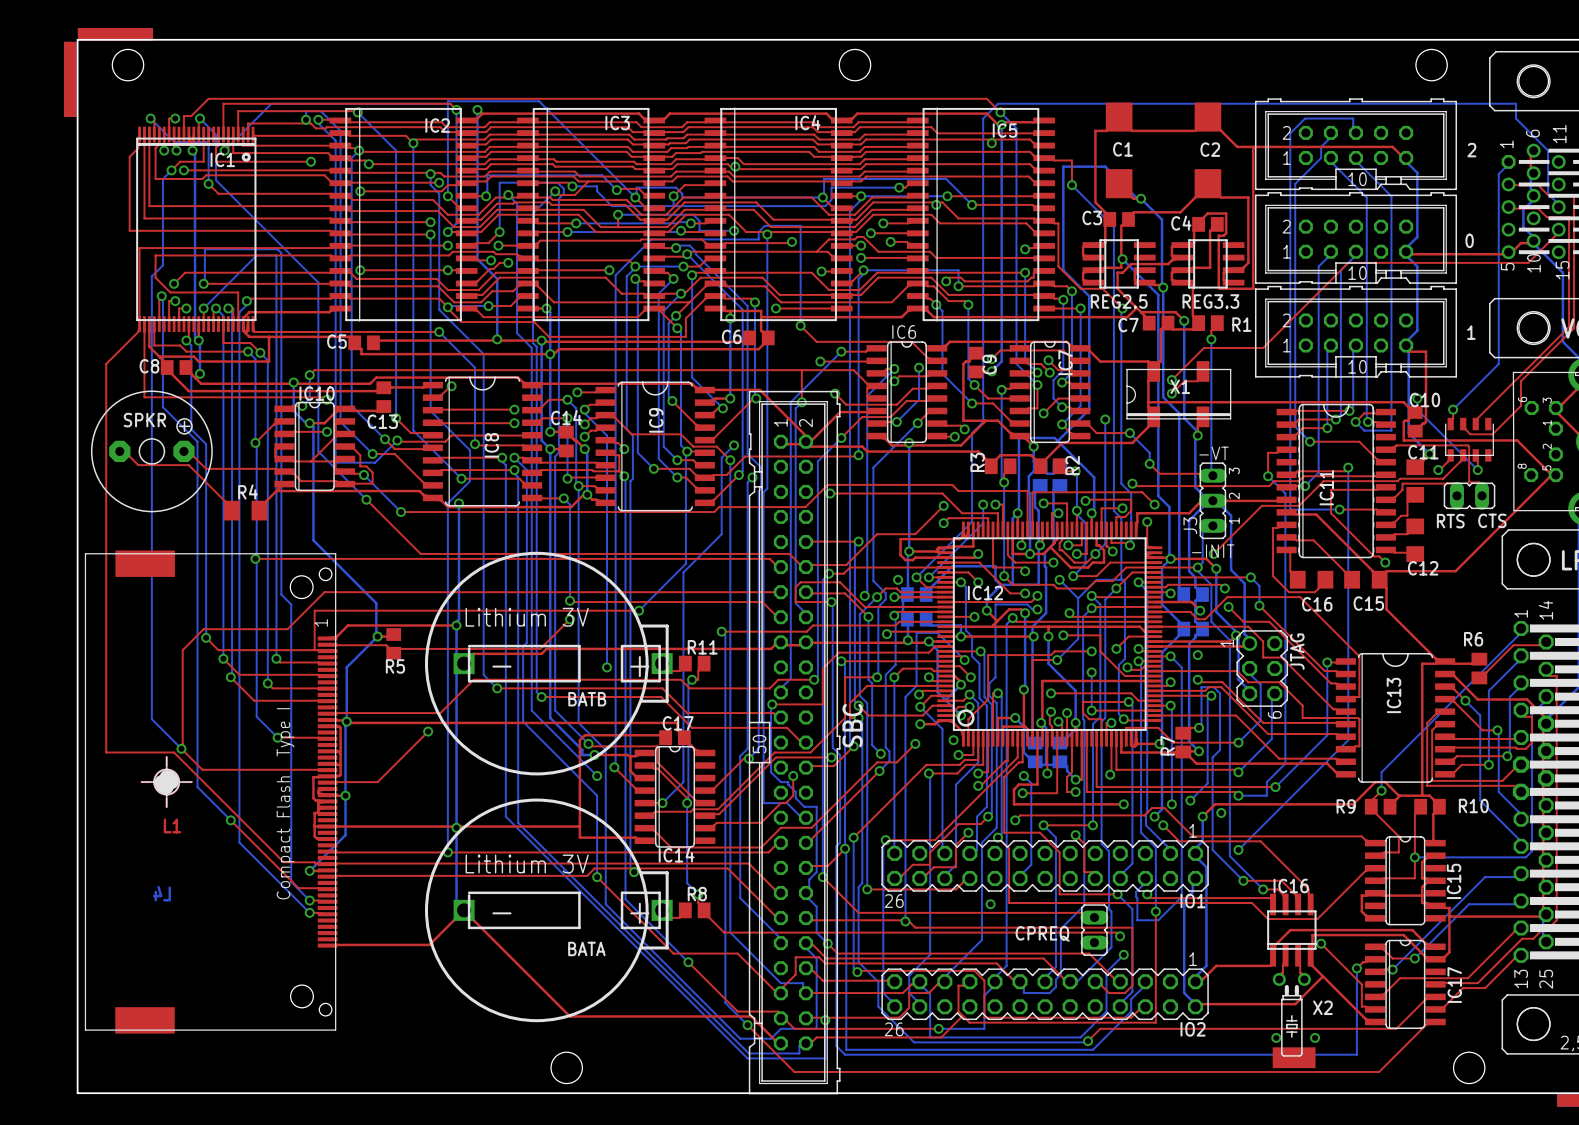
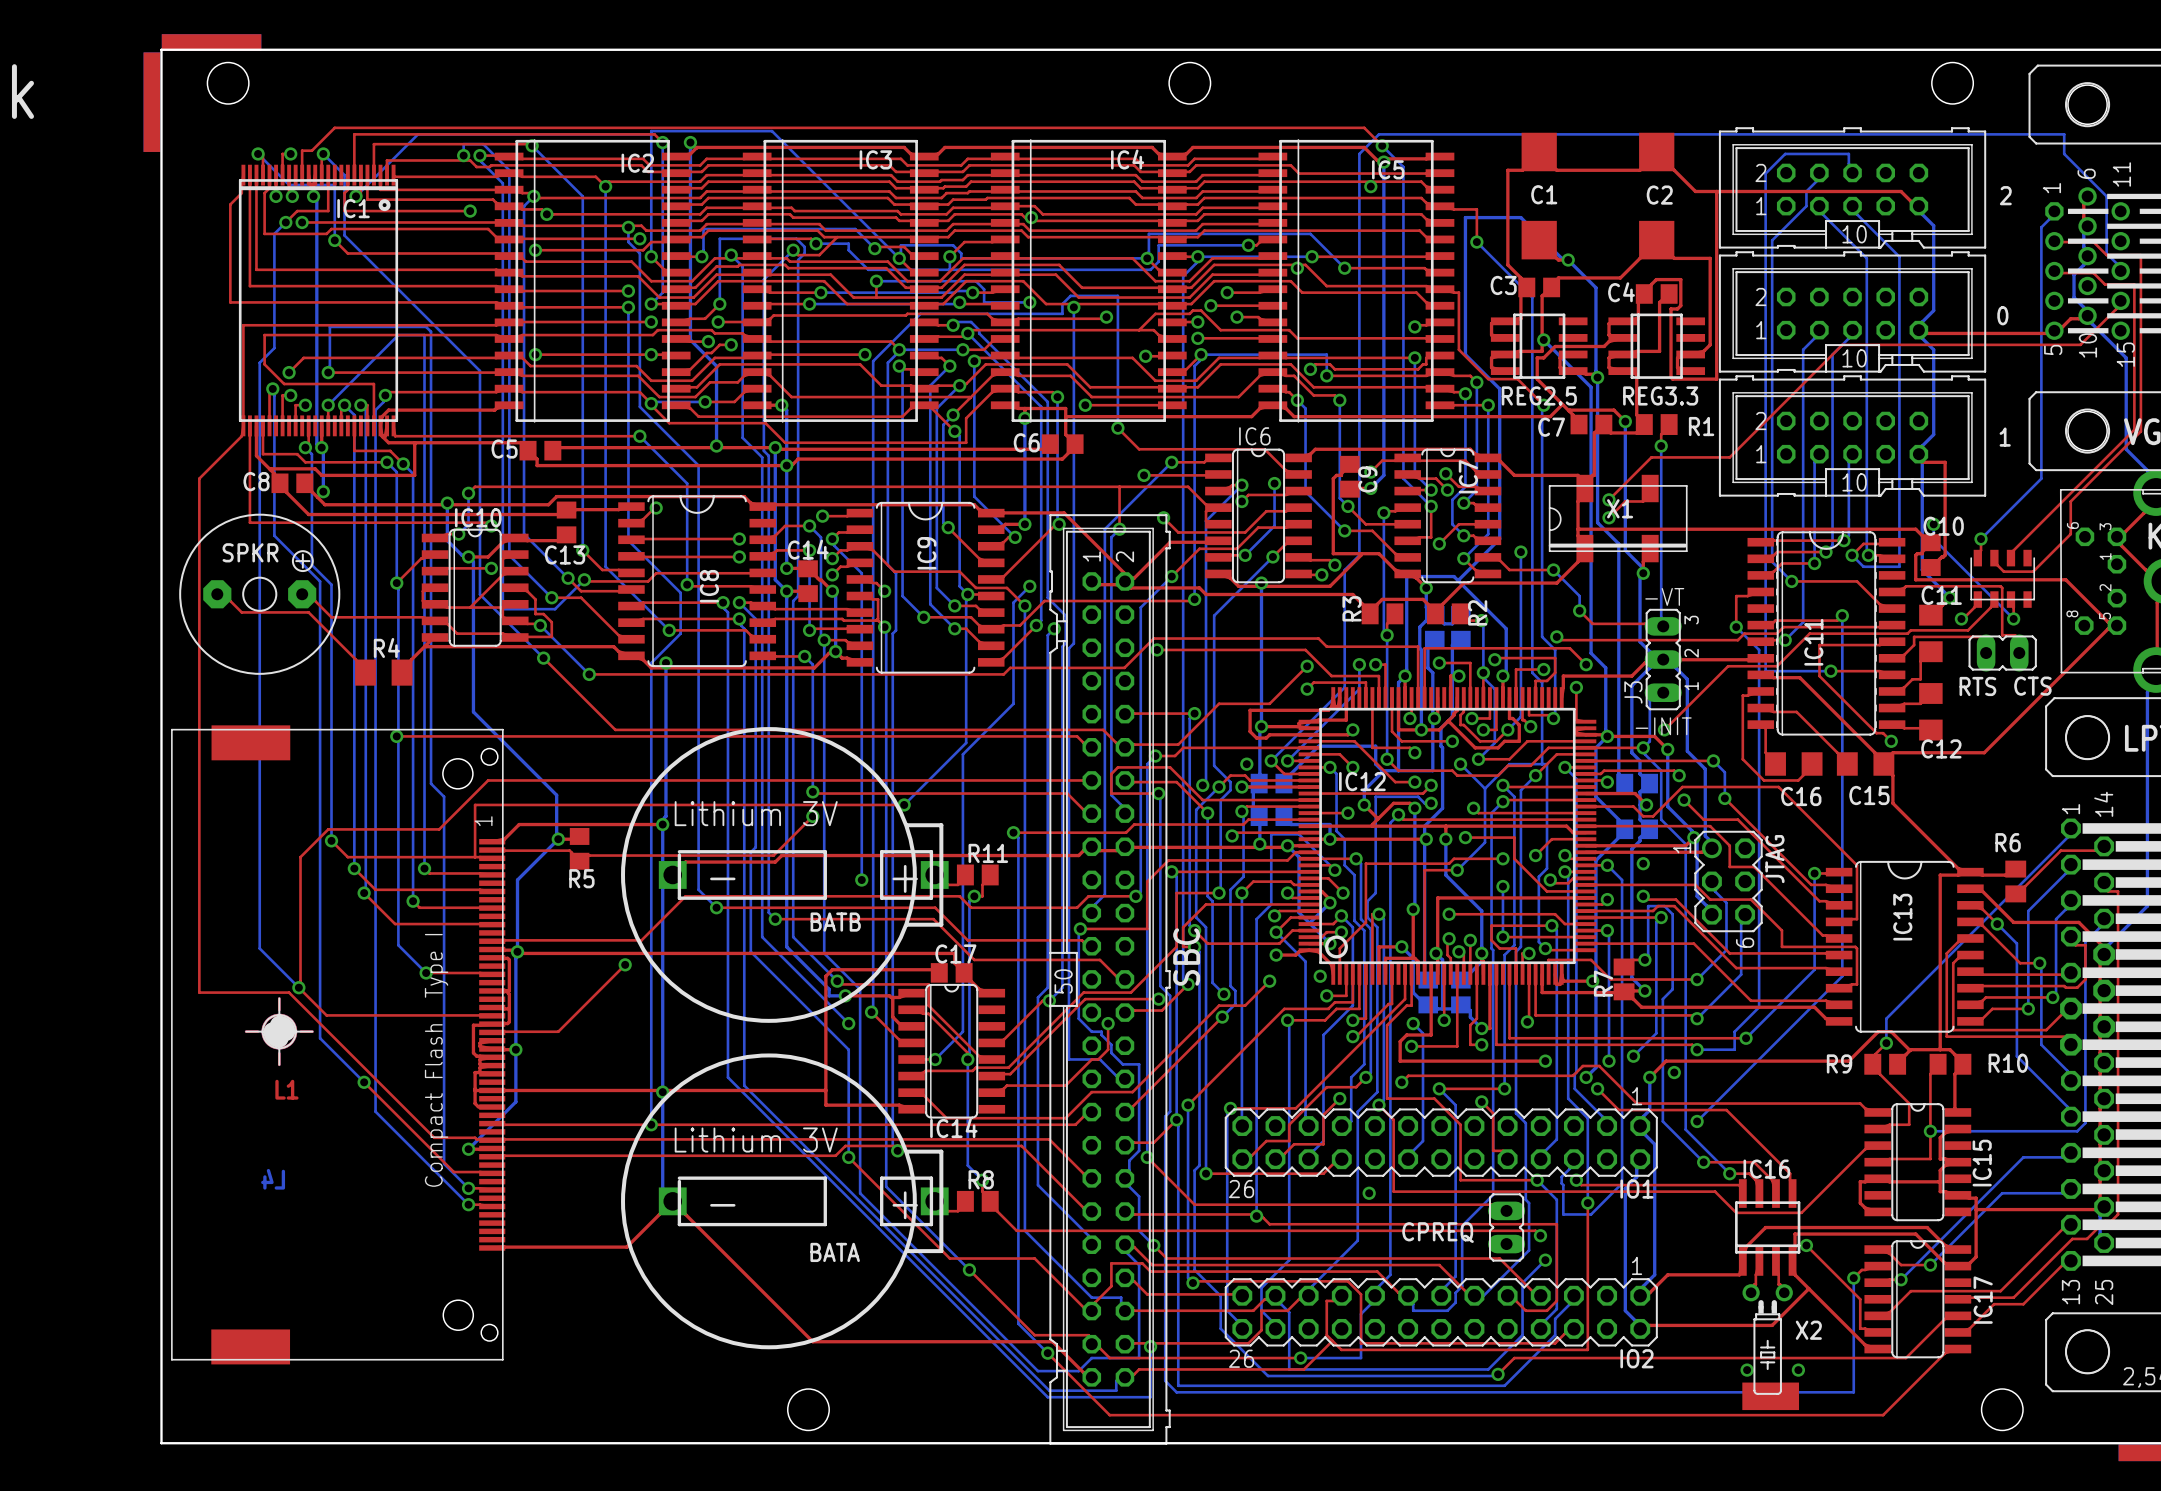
IC7 footprint: [1009, 341, 1091, 444] -> [1394, 448, 1502, 584]

